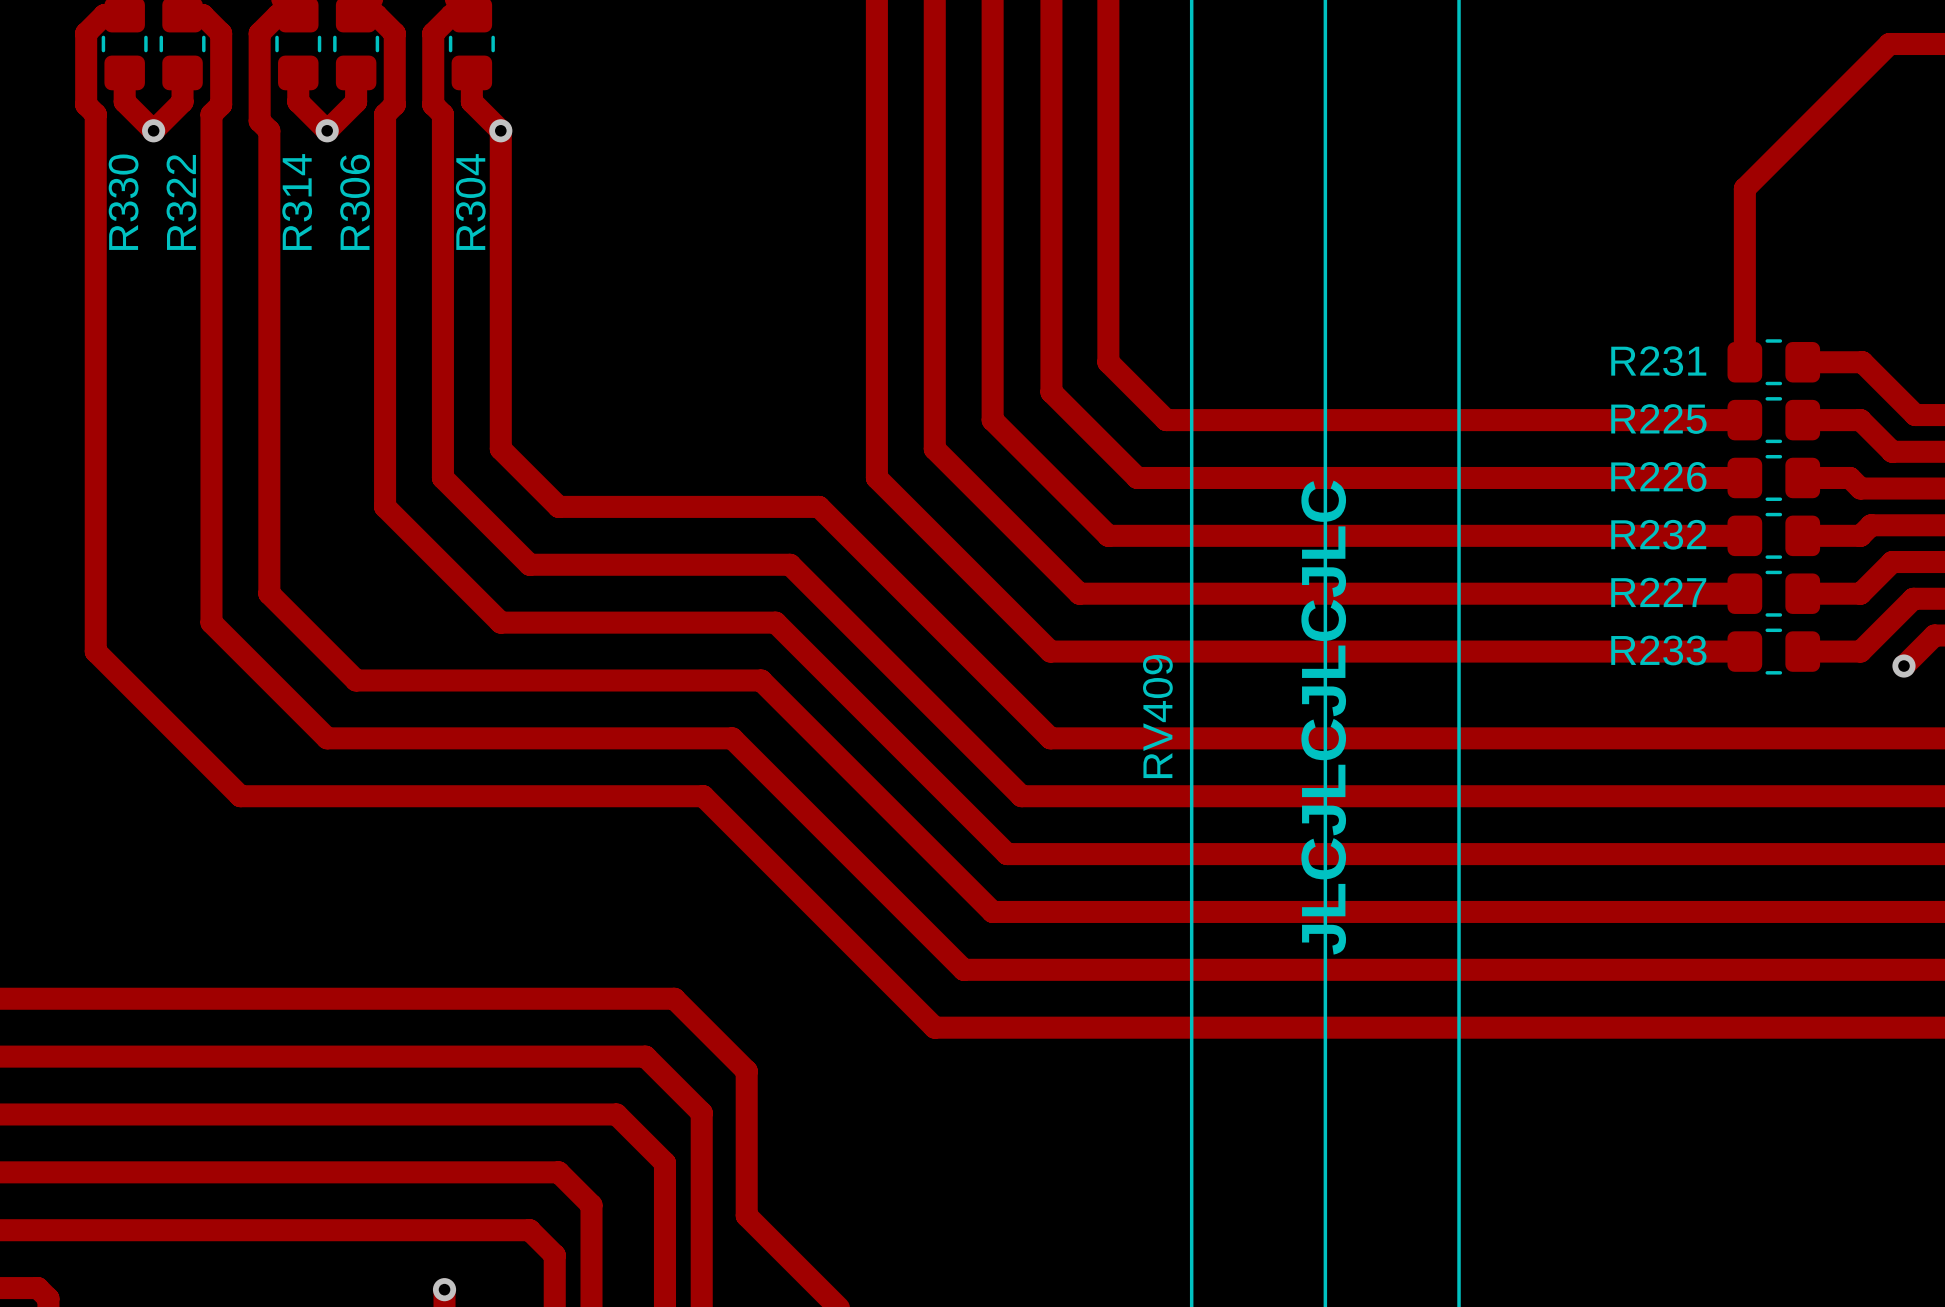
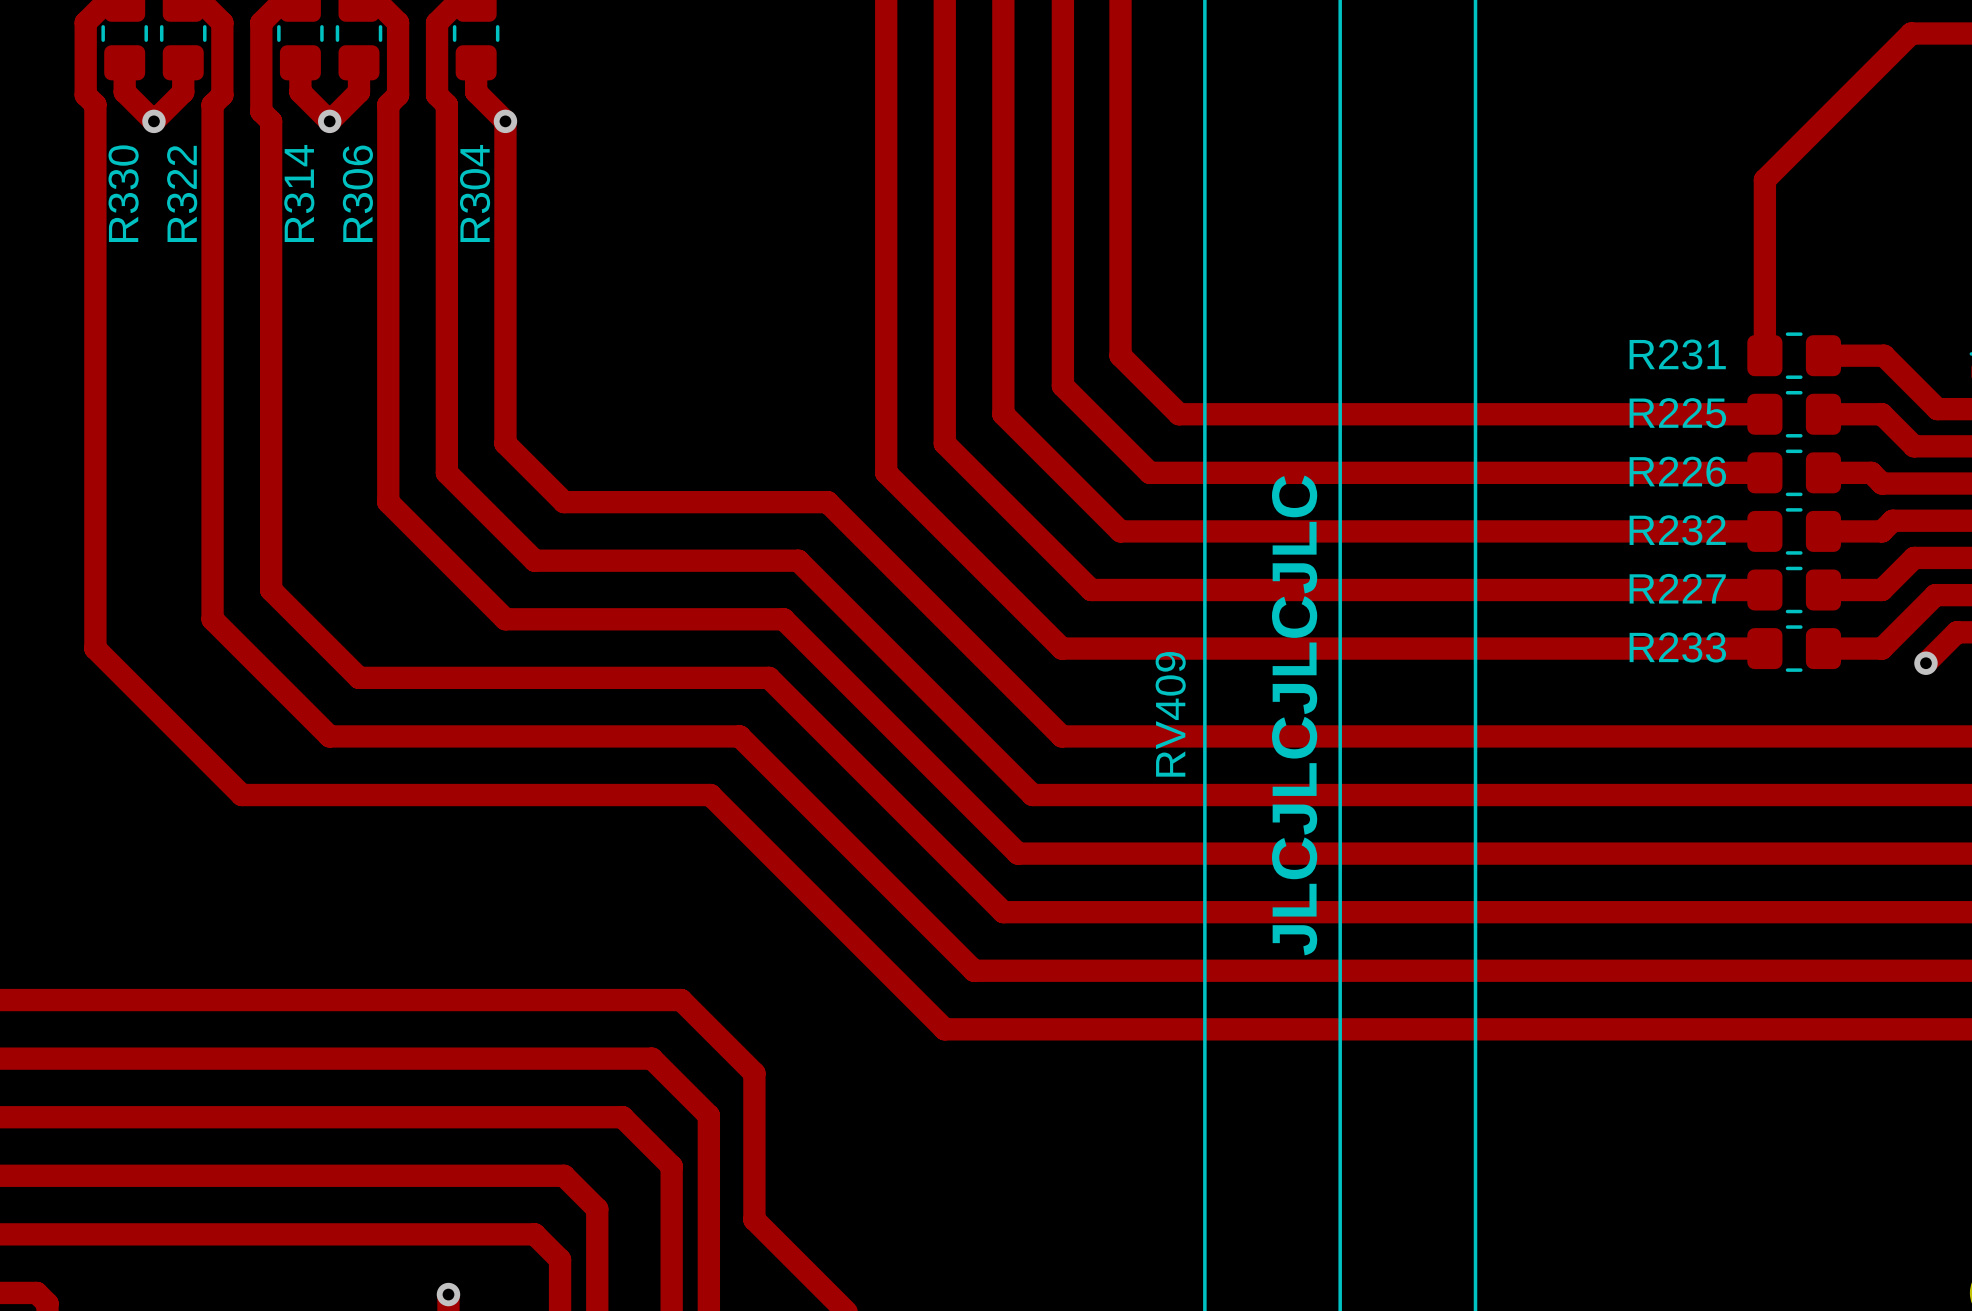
text position: JLCJLCJLCJLC (1323, 717) -> JLCJLCJLCJLC (1294, 715)

